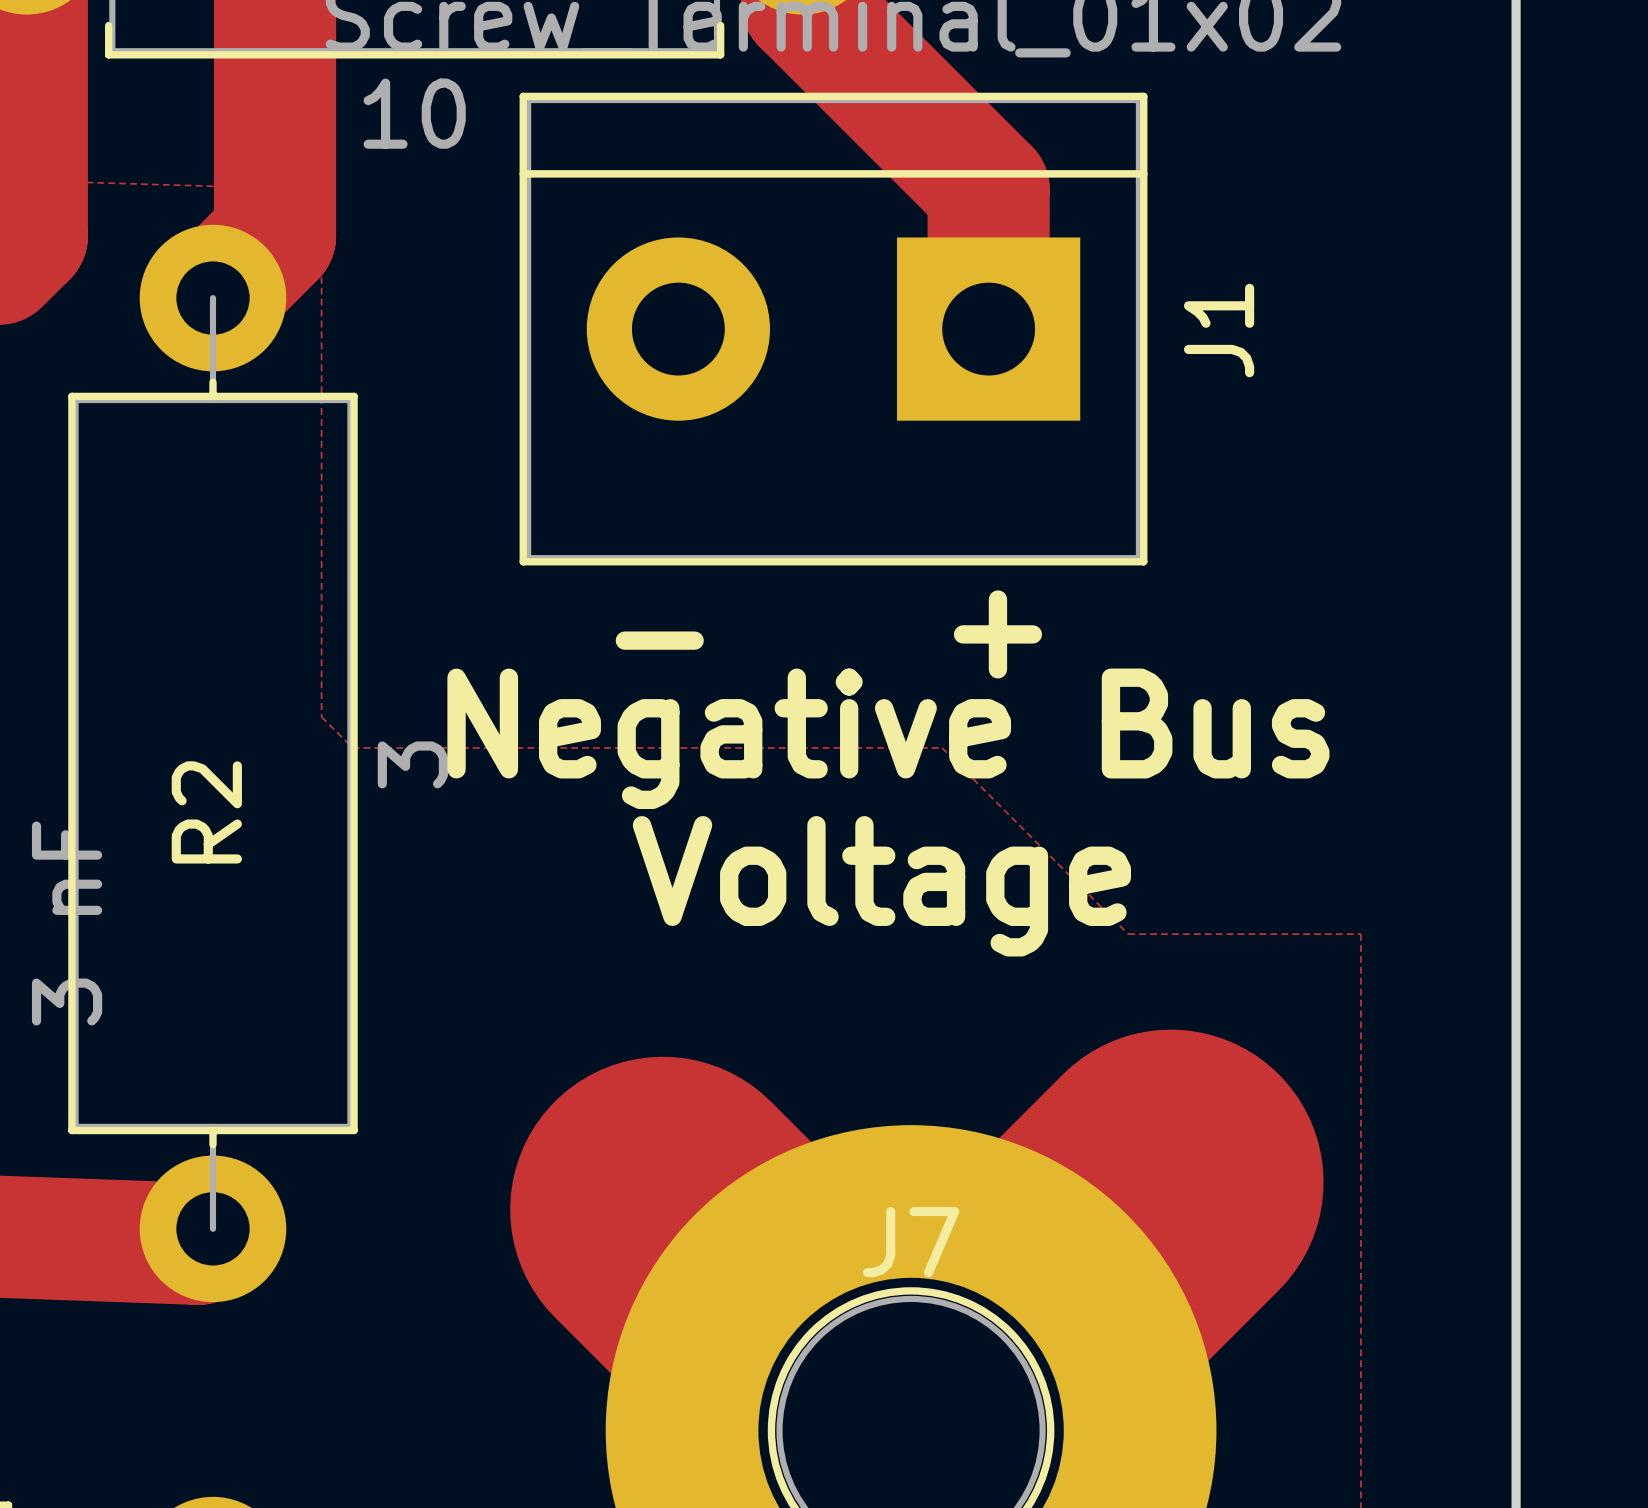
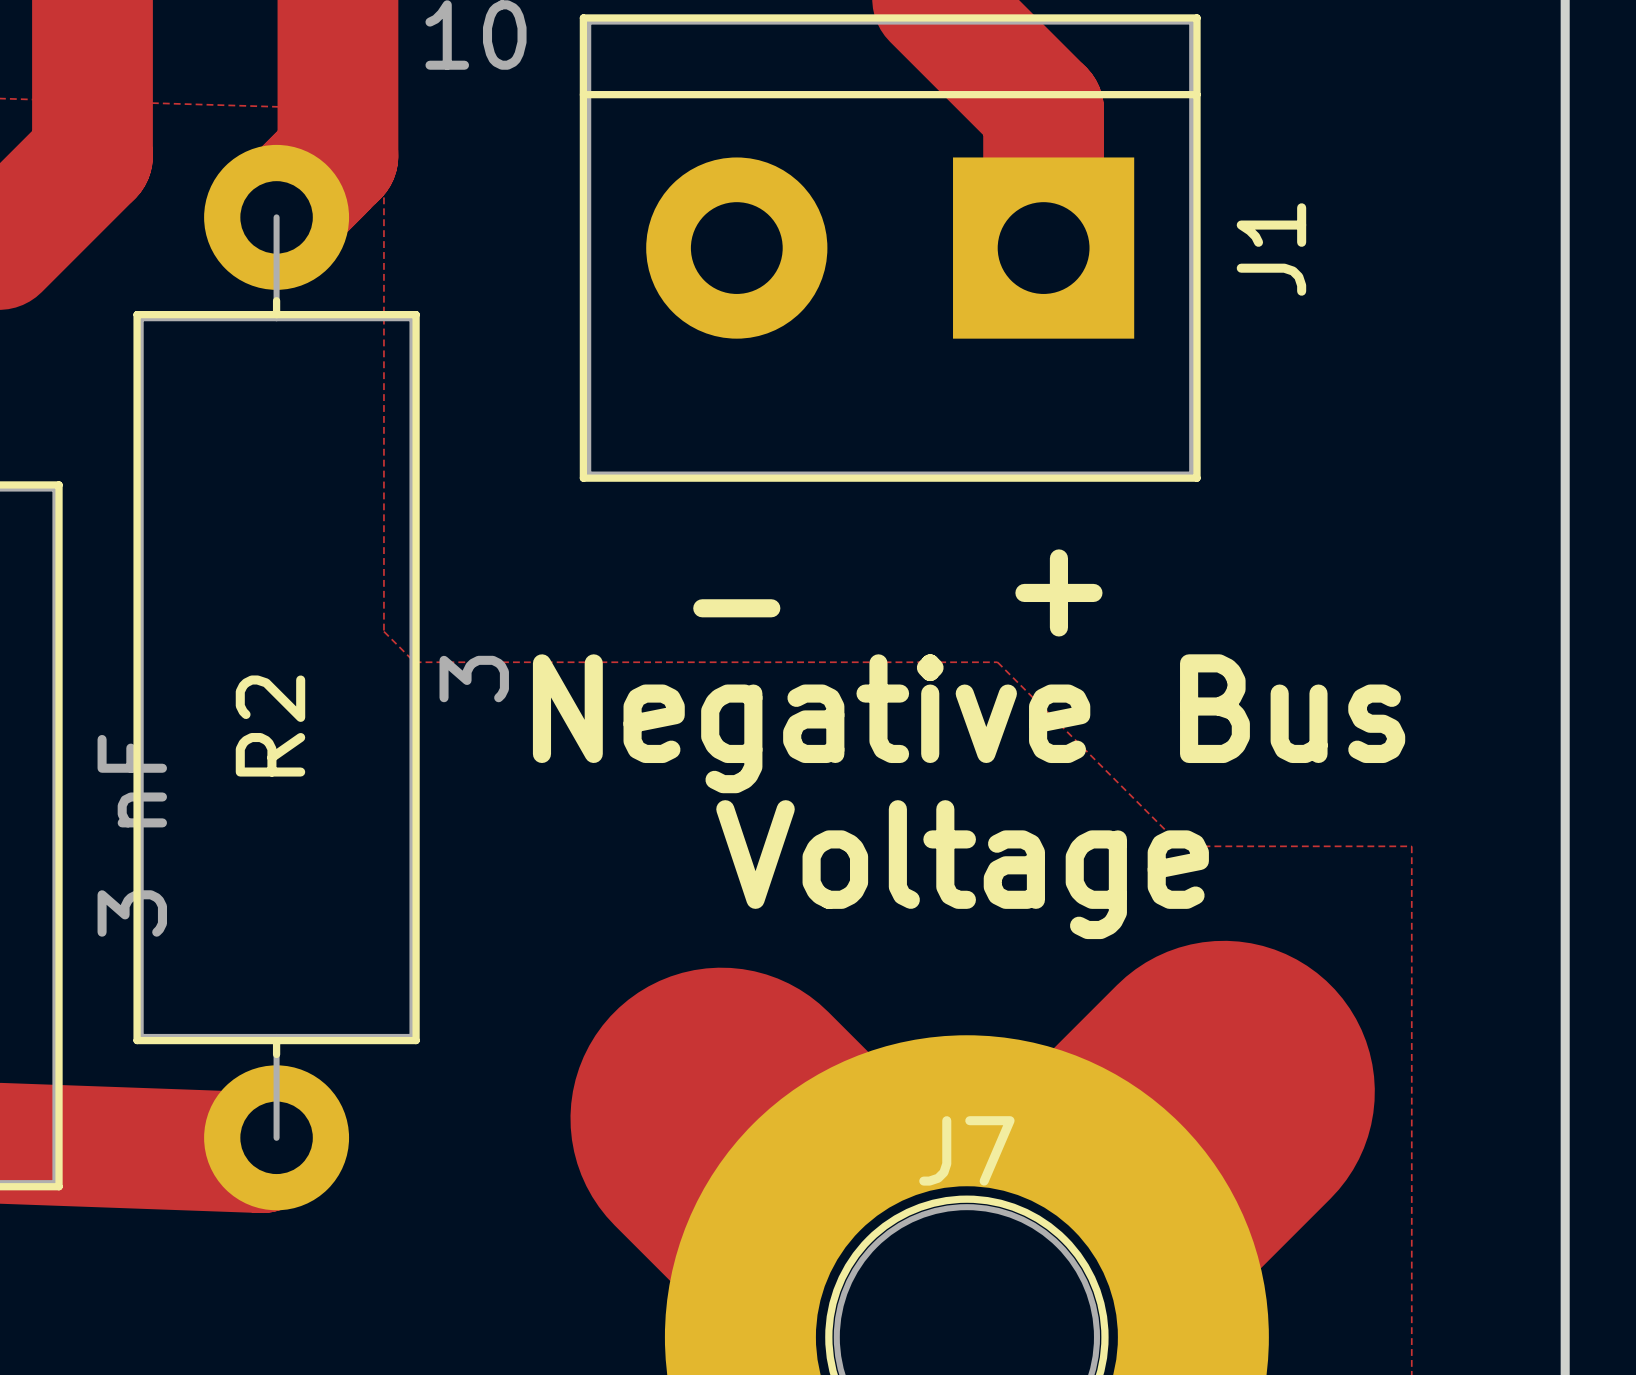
text position: + (997, 634) -> + (1058, 592)
text position: - (659, 640) -> - (736, 608)
text position: Negative Bus (888, 738) -> Negative Bus (969, 723)
text position: Voltage (881, 886) -> Voltage (962, 869)

